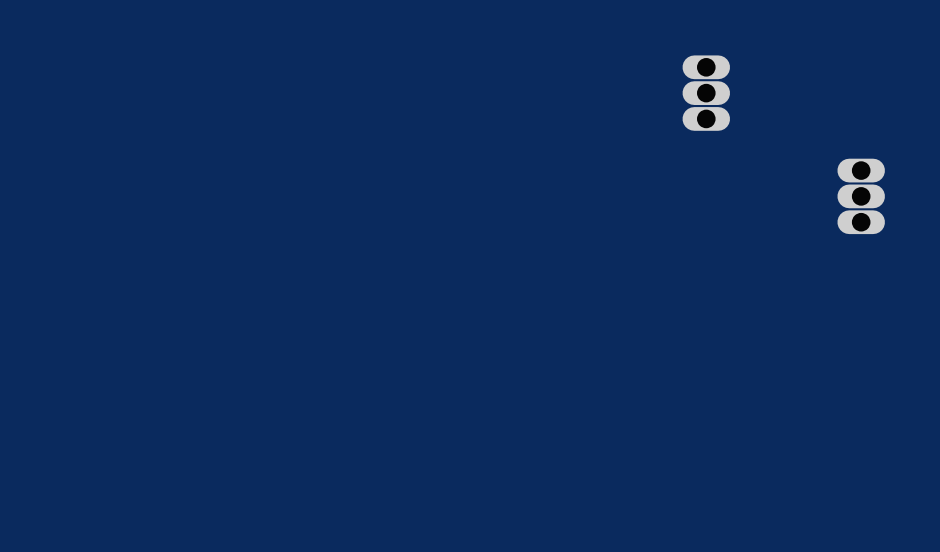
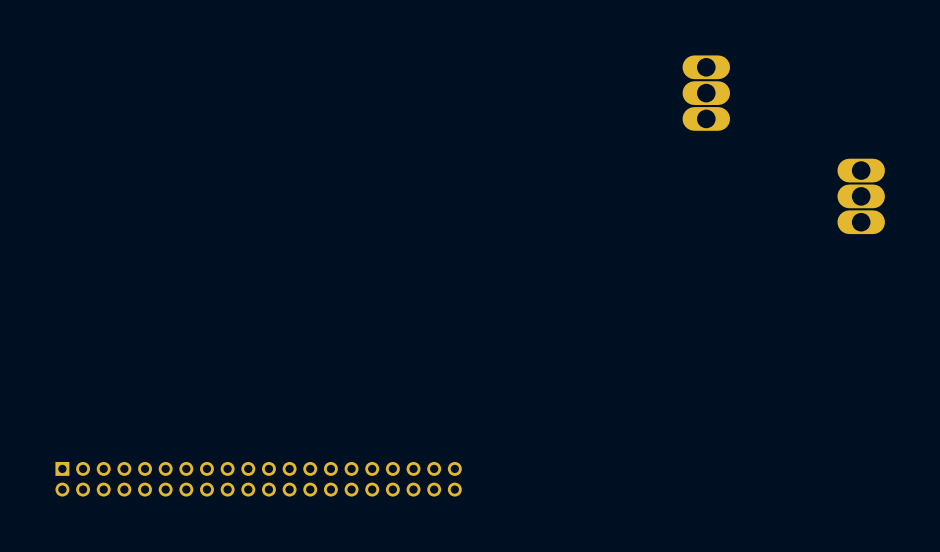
part: none -> (258, 479)

